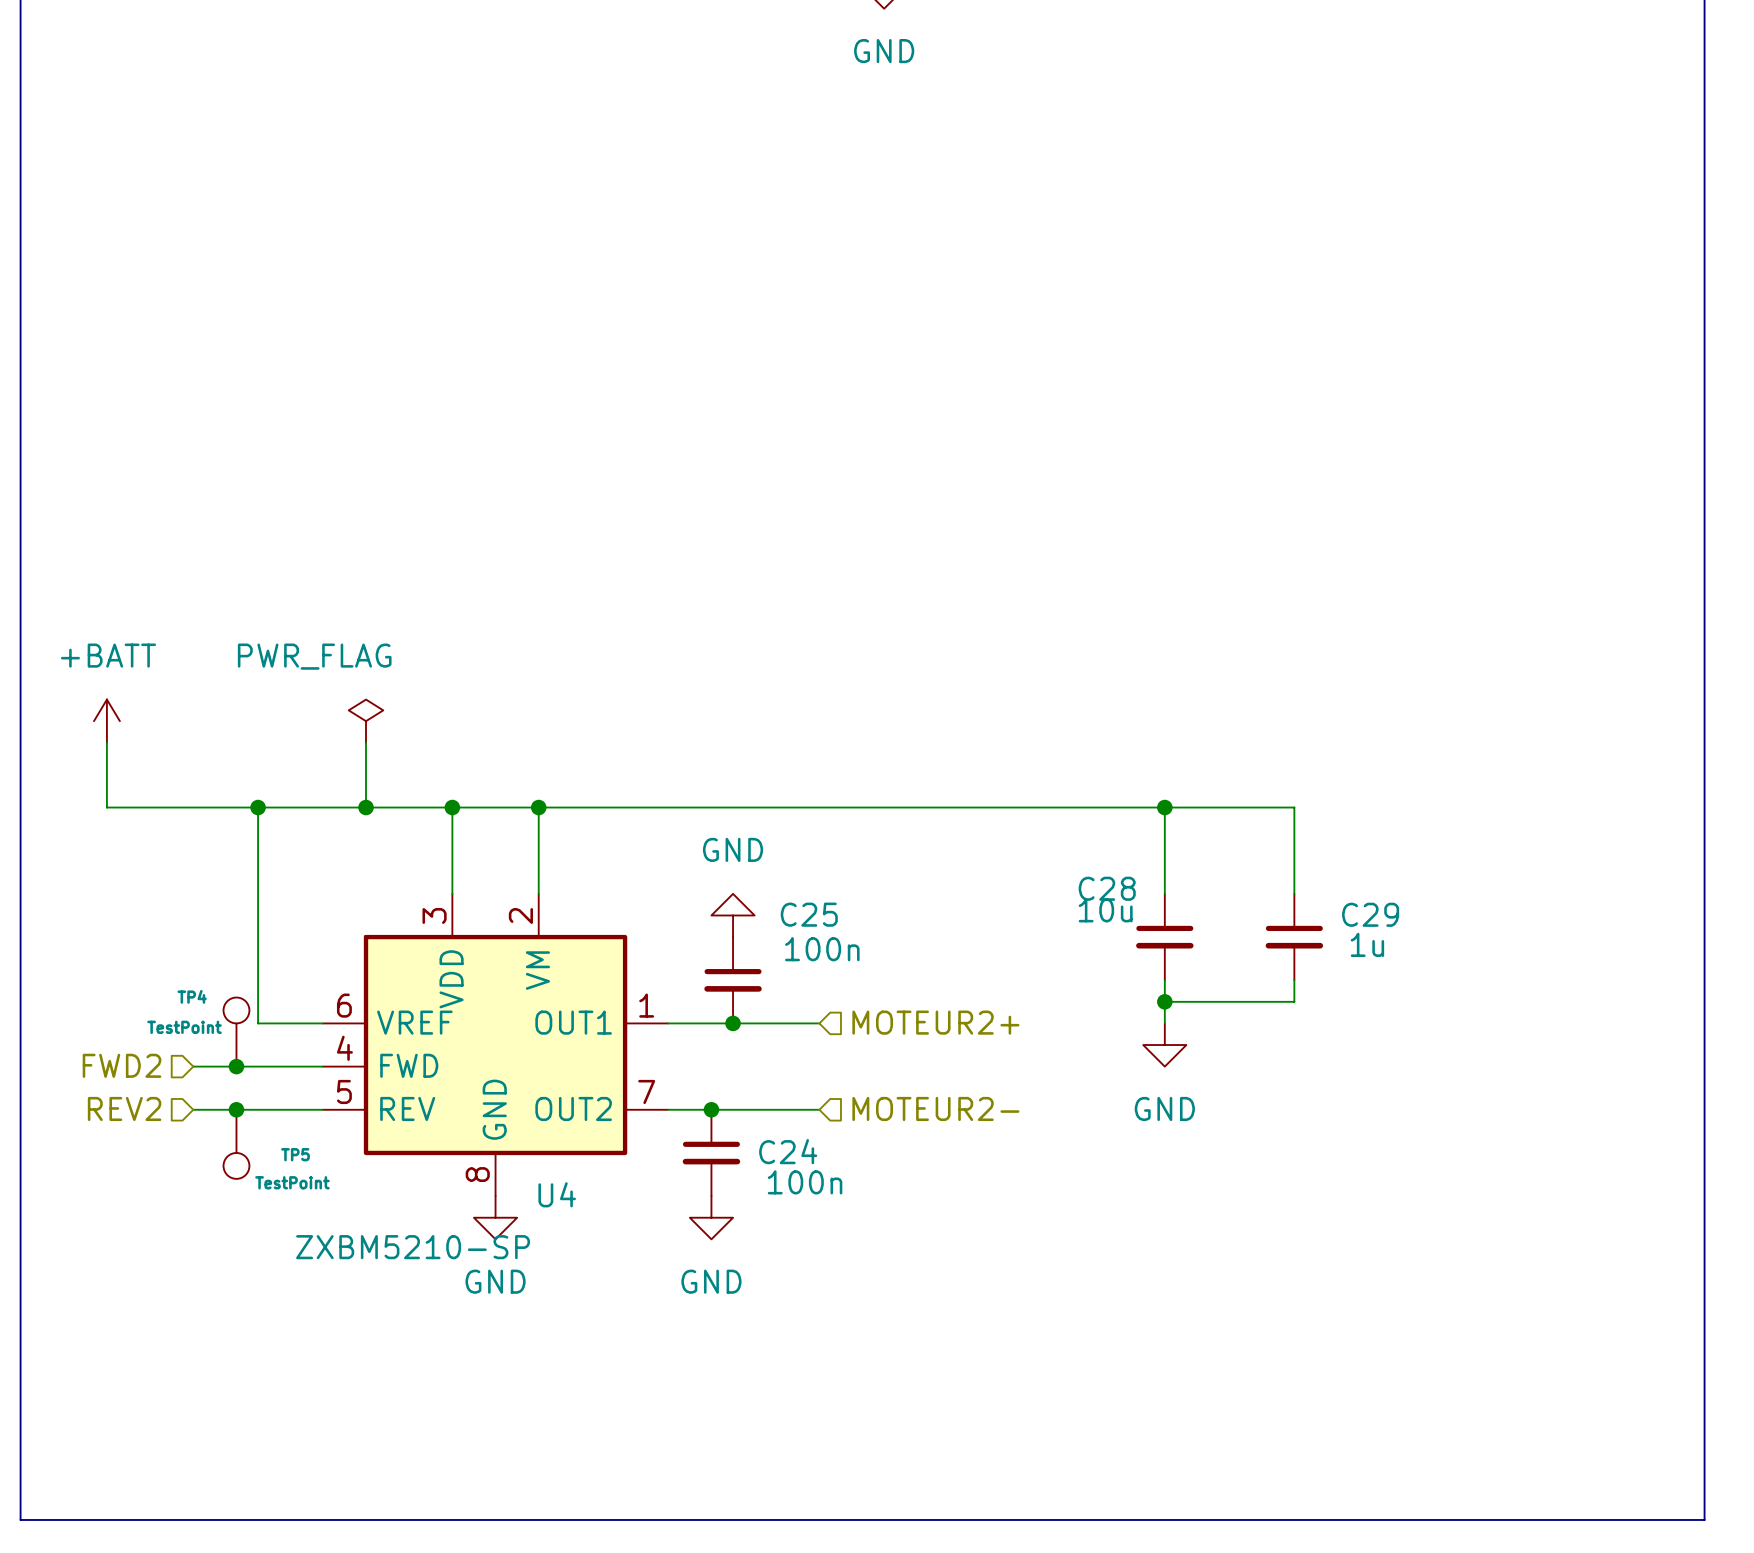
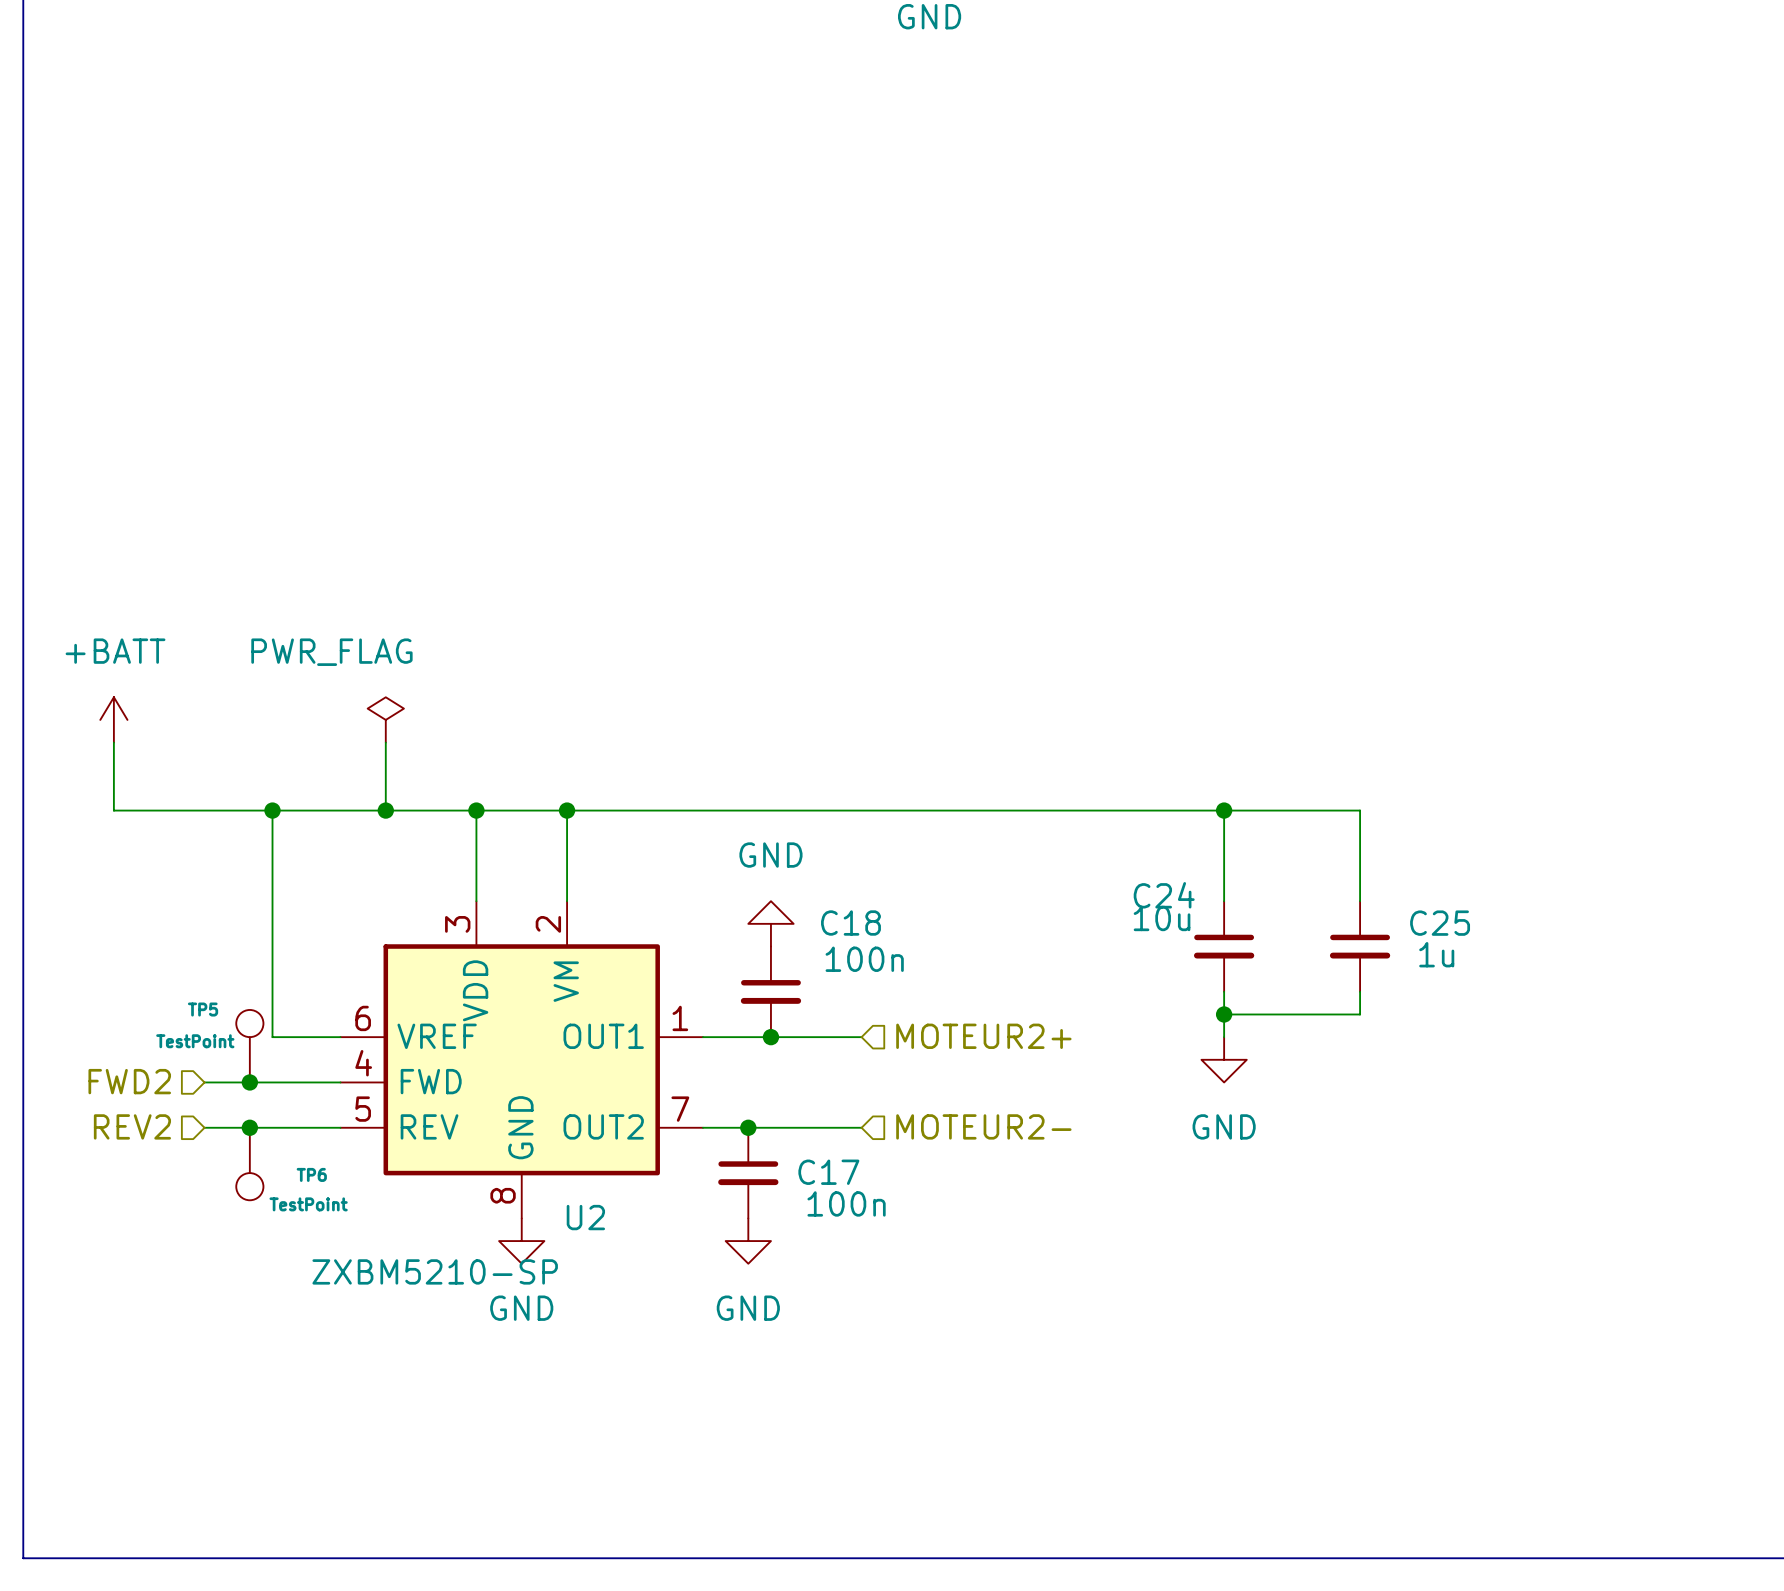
C28 name: C28 (1107, 888) -> C24 (1164, 895)
C25 name: C25 (809, 914) -> C18 (850, 923)
C29 name: C29 (1370, 914) -> C25 (1440, 923)
TP4 name: TP4 (192, 996) -> TP5 (203, 1009)
C24 name: C24 (788, 1151) -> C17 (828, 1172)
TP5 name: TP5 (295, 1154) -> TP6 (311, 1174)
U4 name: U4 (557, 1194) -> U2 (585, 1217)

